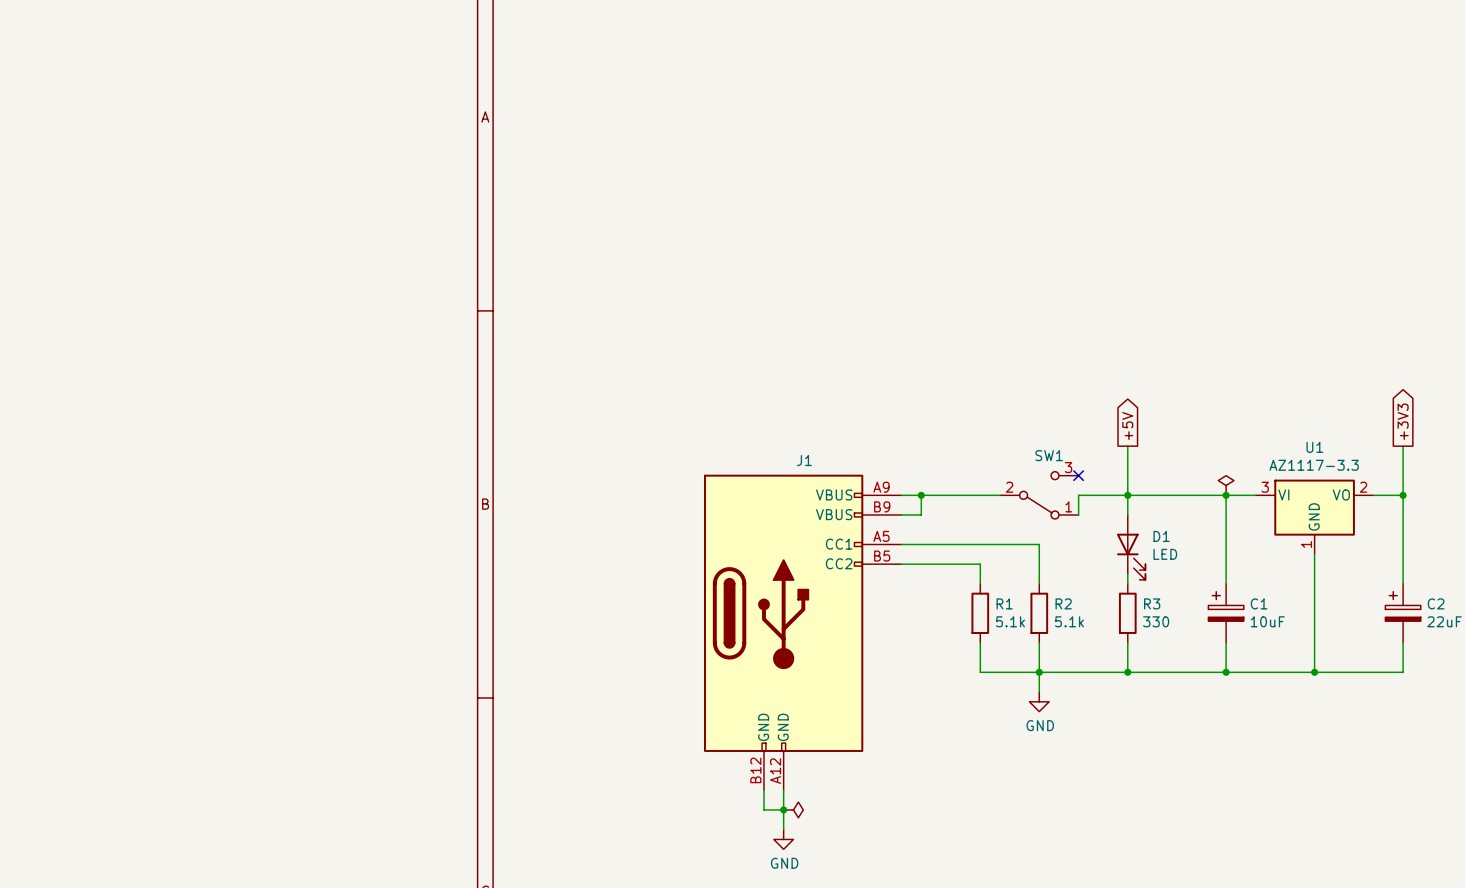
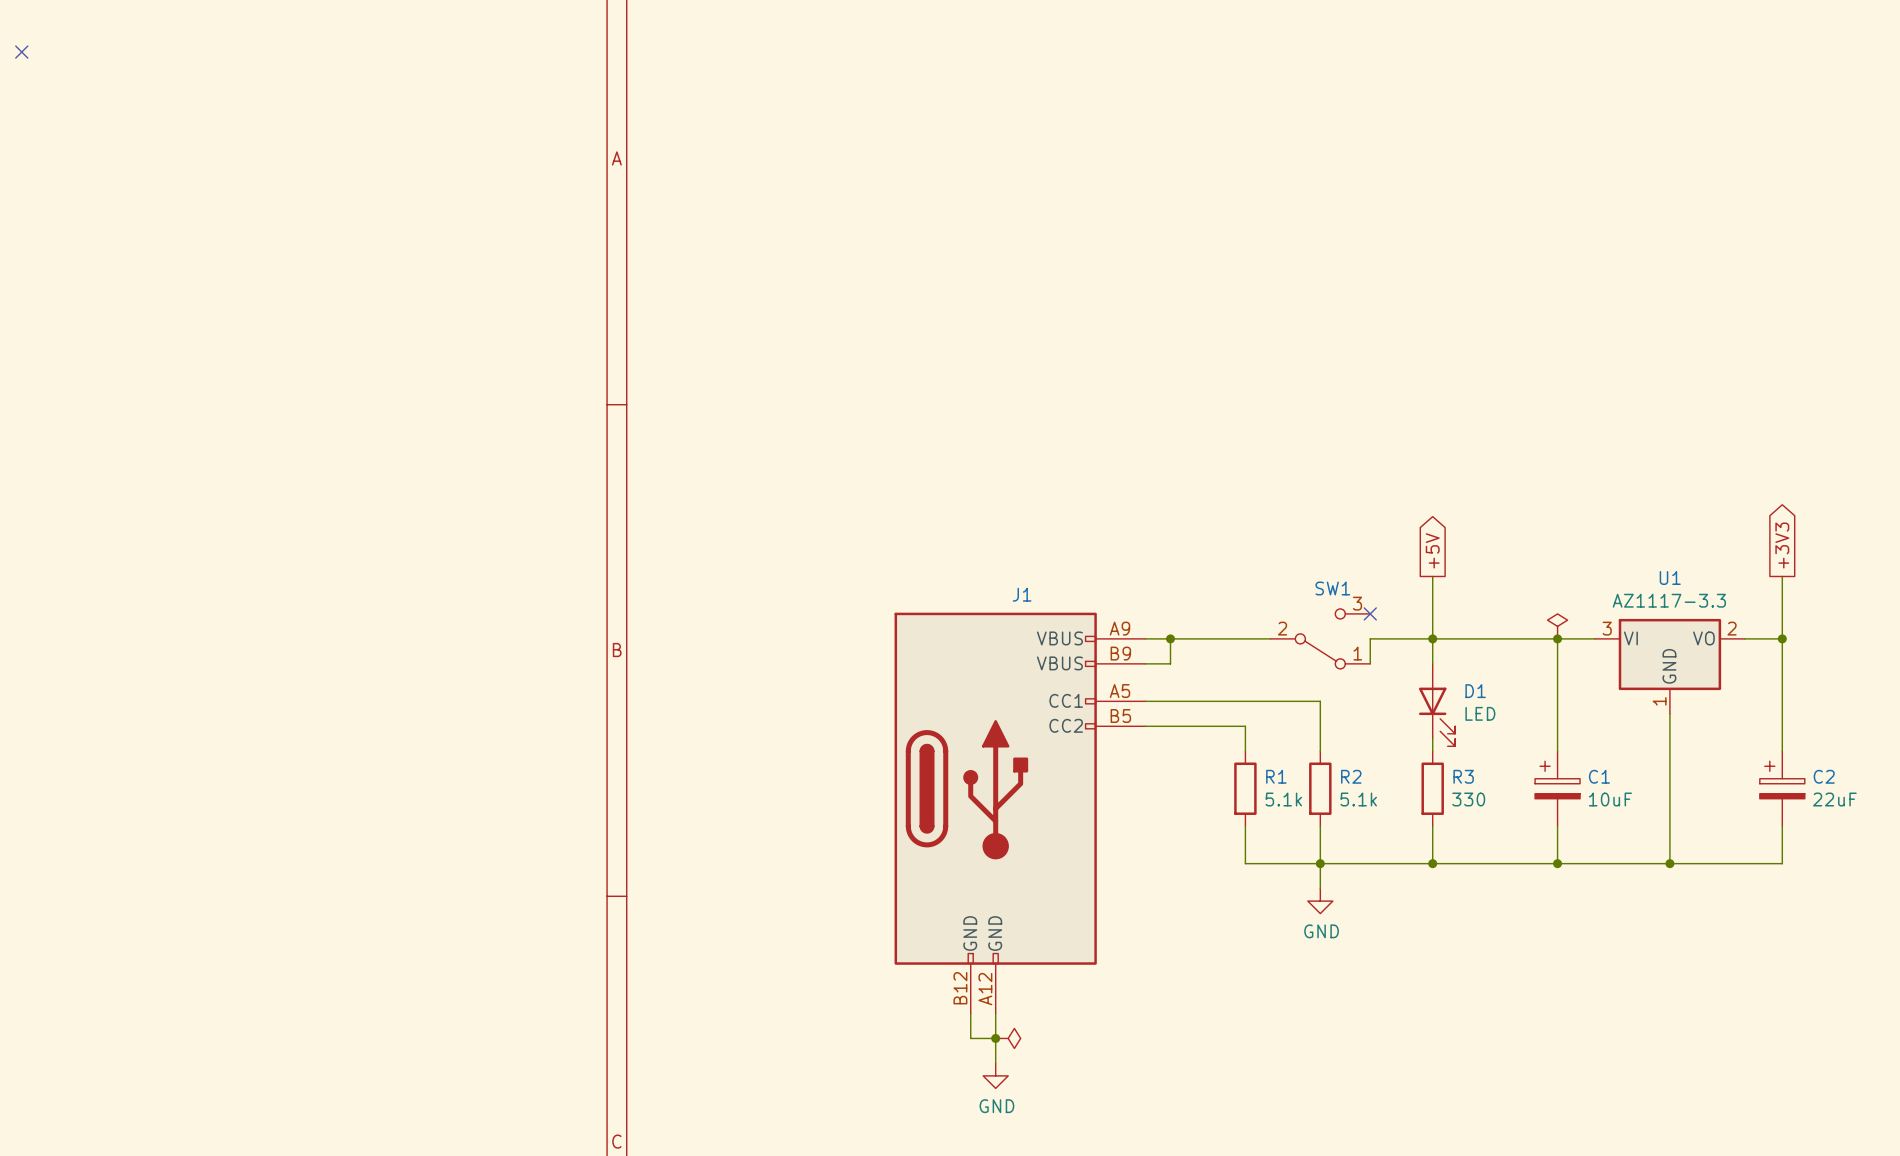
no-connect mark: none -> (21, 52)

